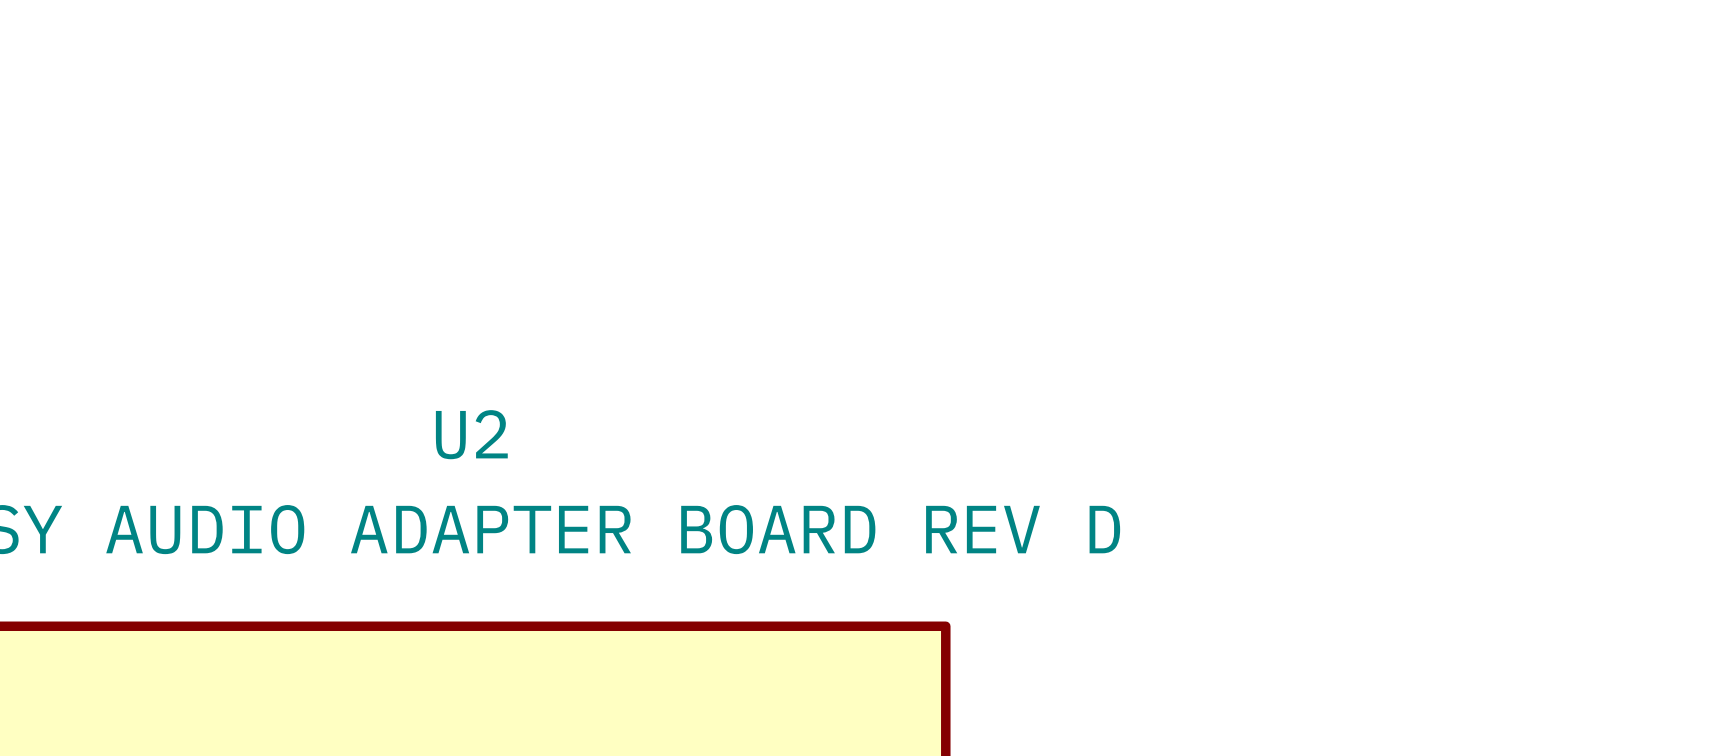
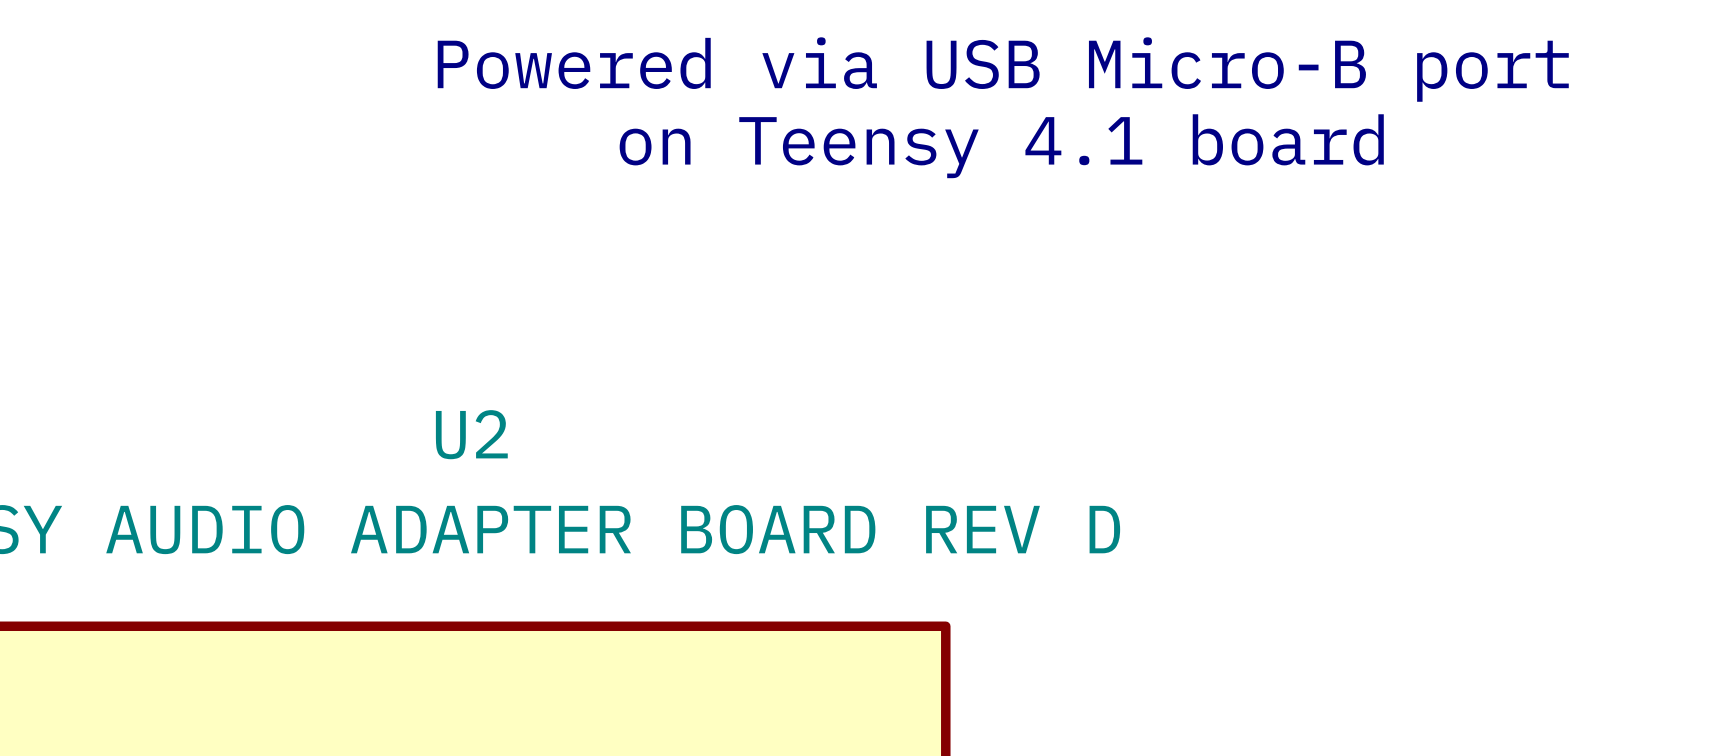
text: none -> Powered via USB Micro-B port (1003, 69)
text: none -> on Teensy 4.1 board (1001, 146)

